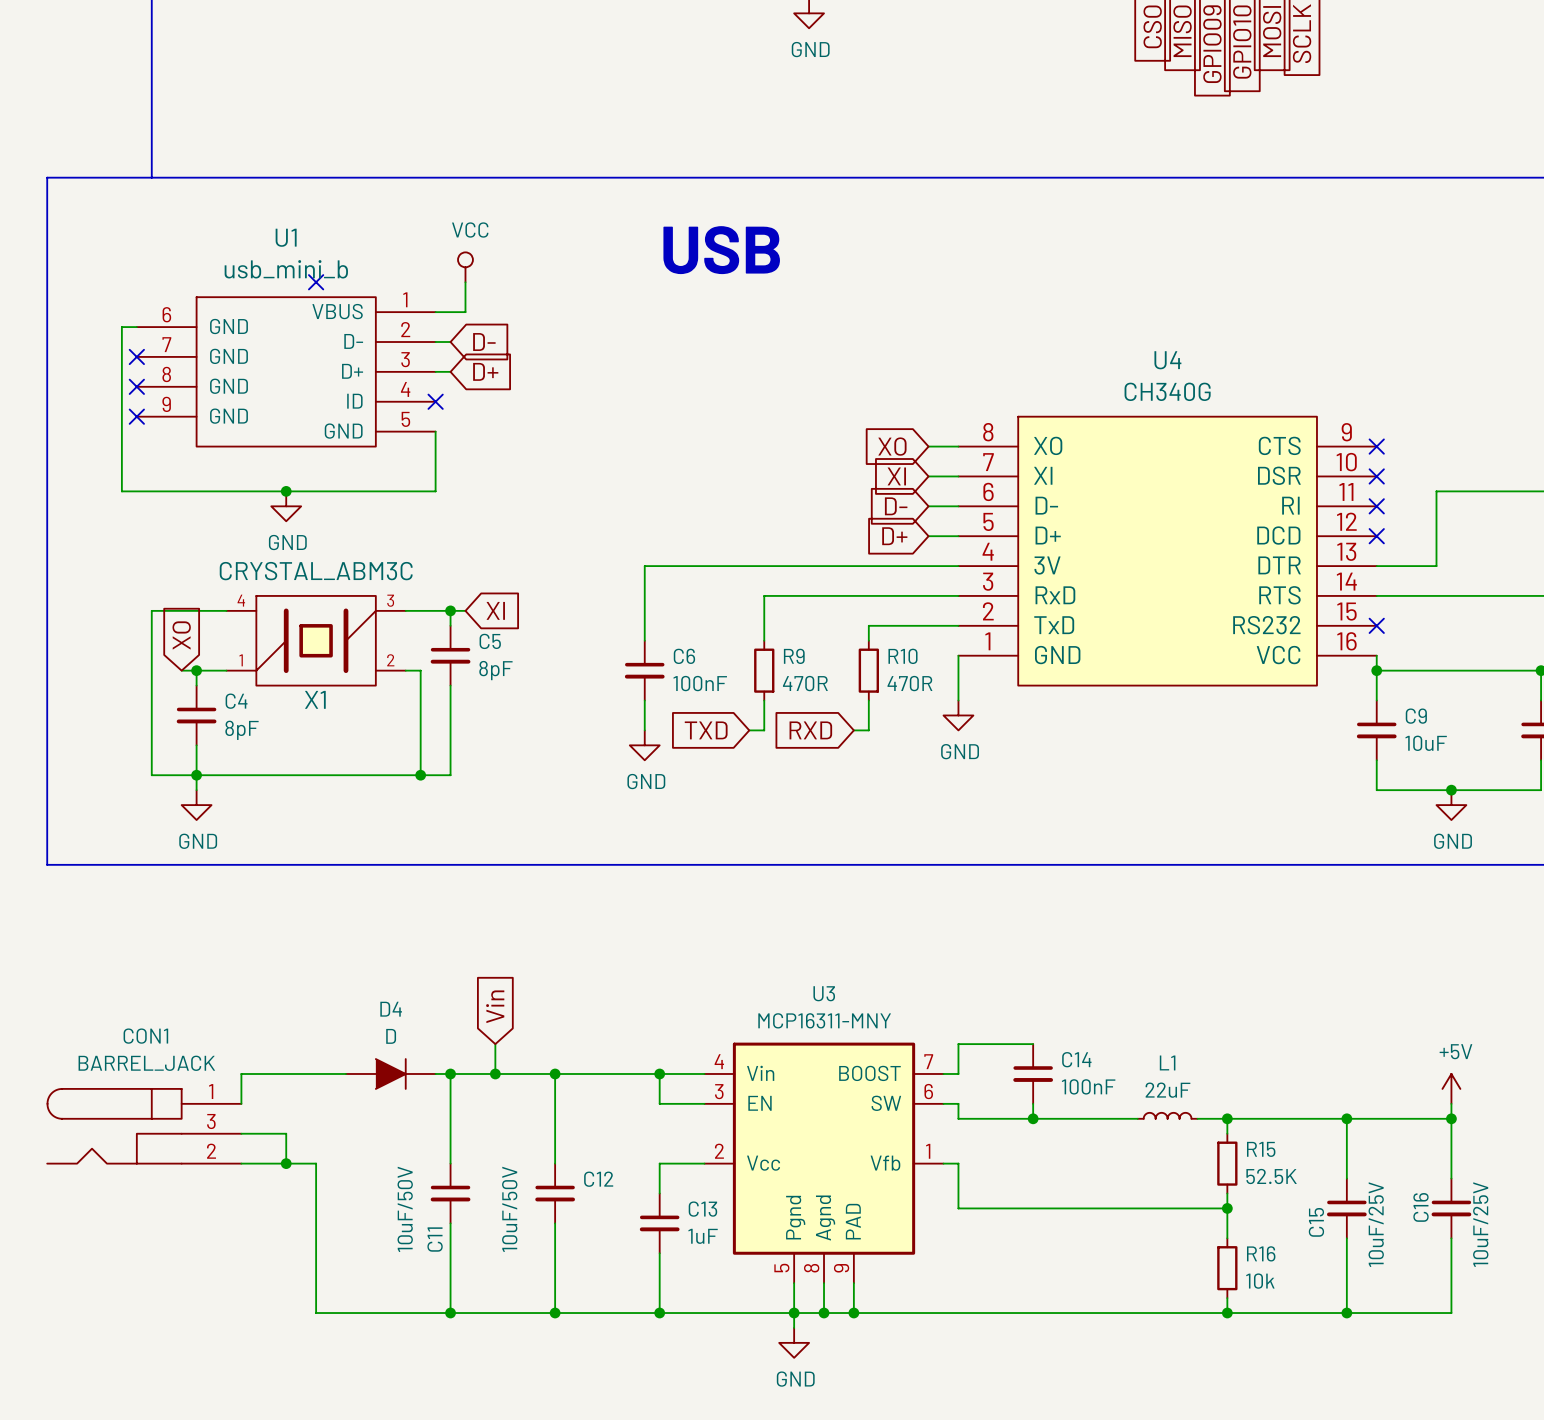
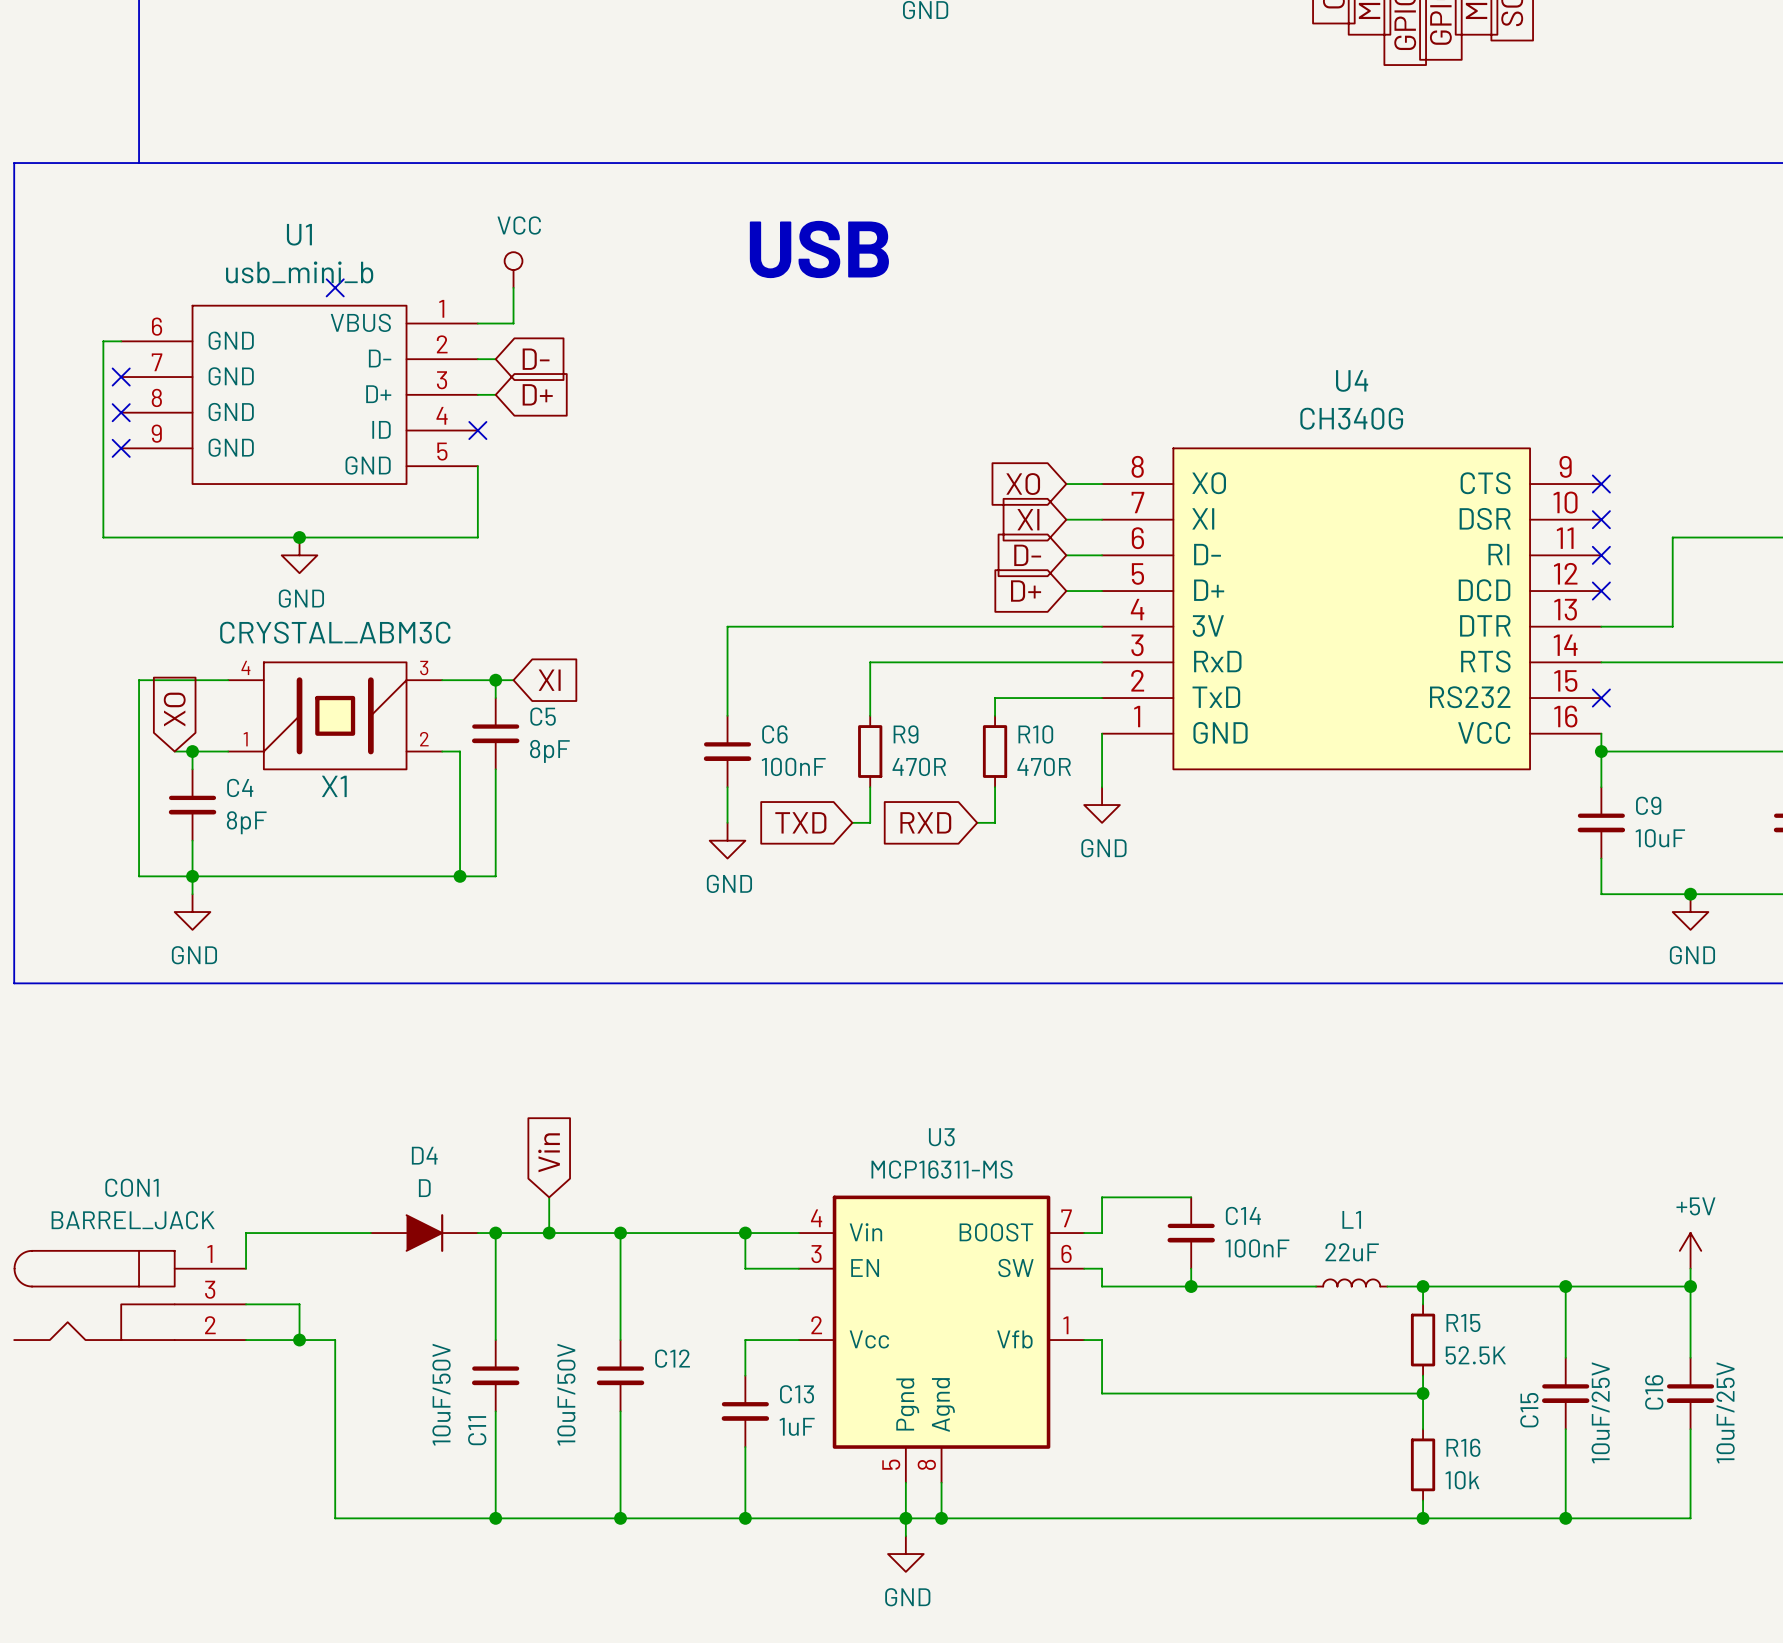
U3 value: MCP16311-MNY (824, 1020) -> MCP16311-MS (942, 1169)
U3 symbol: [704, 1042, 944, 1284] -> [798, 1195, 1085, 1483]
wire: (853, 1283) (853, 1313) -> none
junction: (853, 1313) -> none

